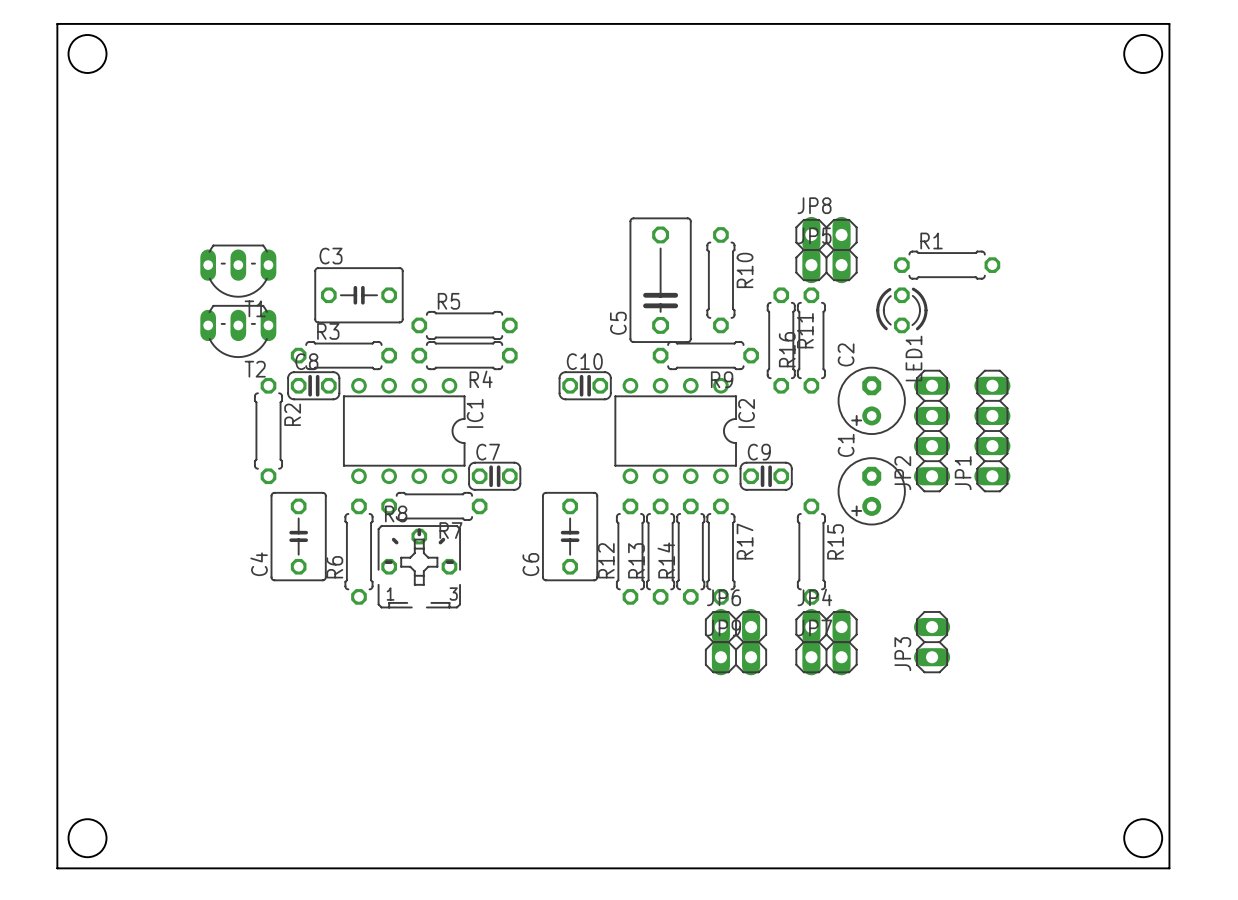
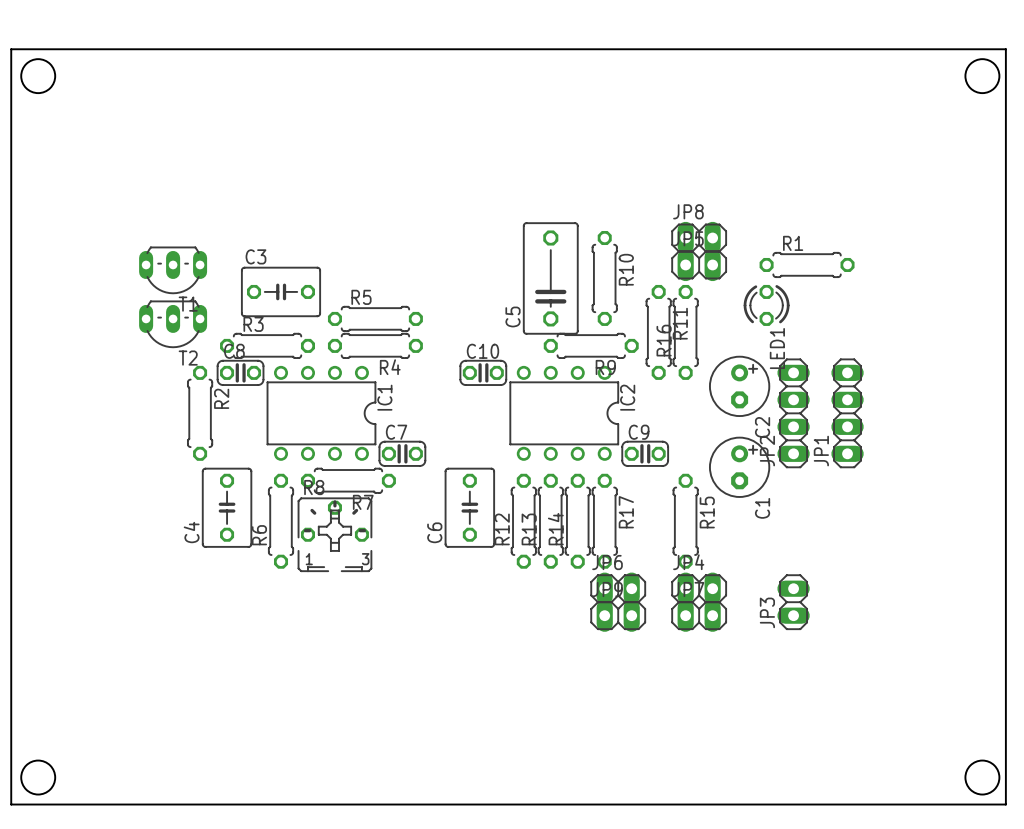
C2 rotation: 0° (871, 400) -> 180° (739, 386)
C1 rotation: 0° (871, 491) -> 180° (739, 467)

